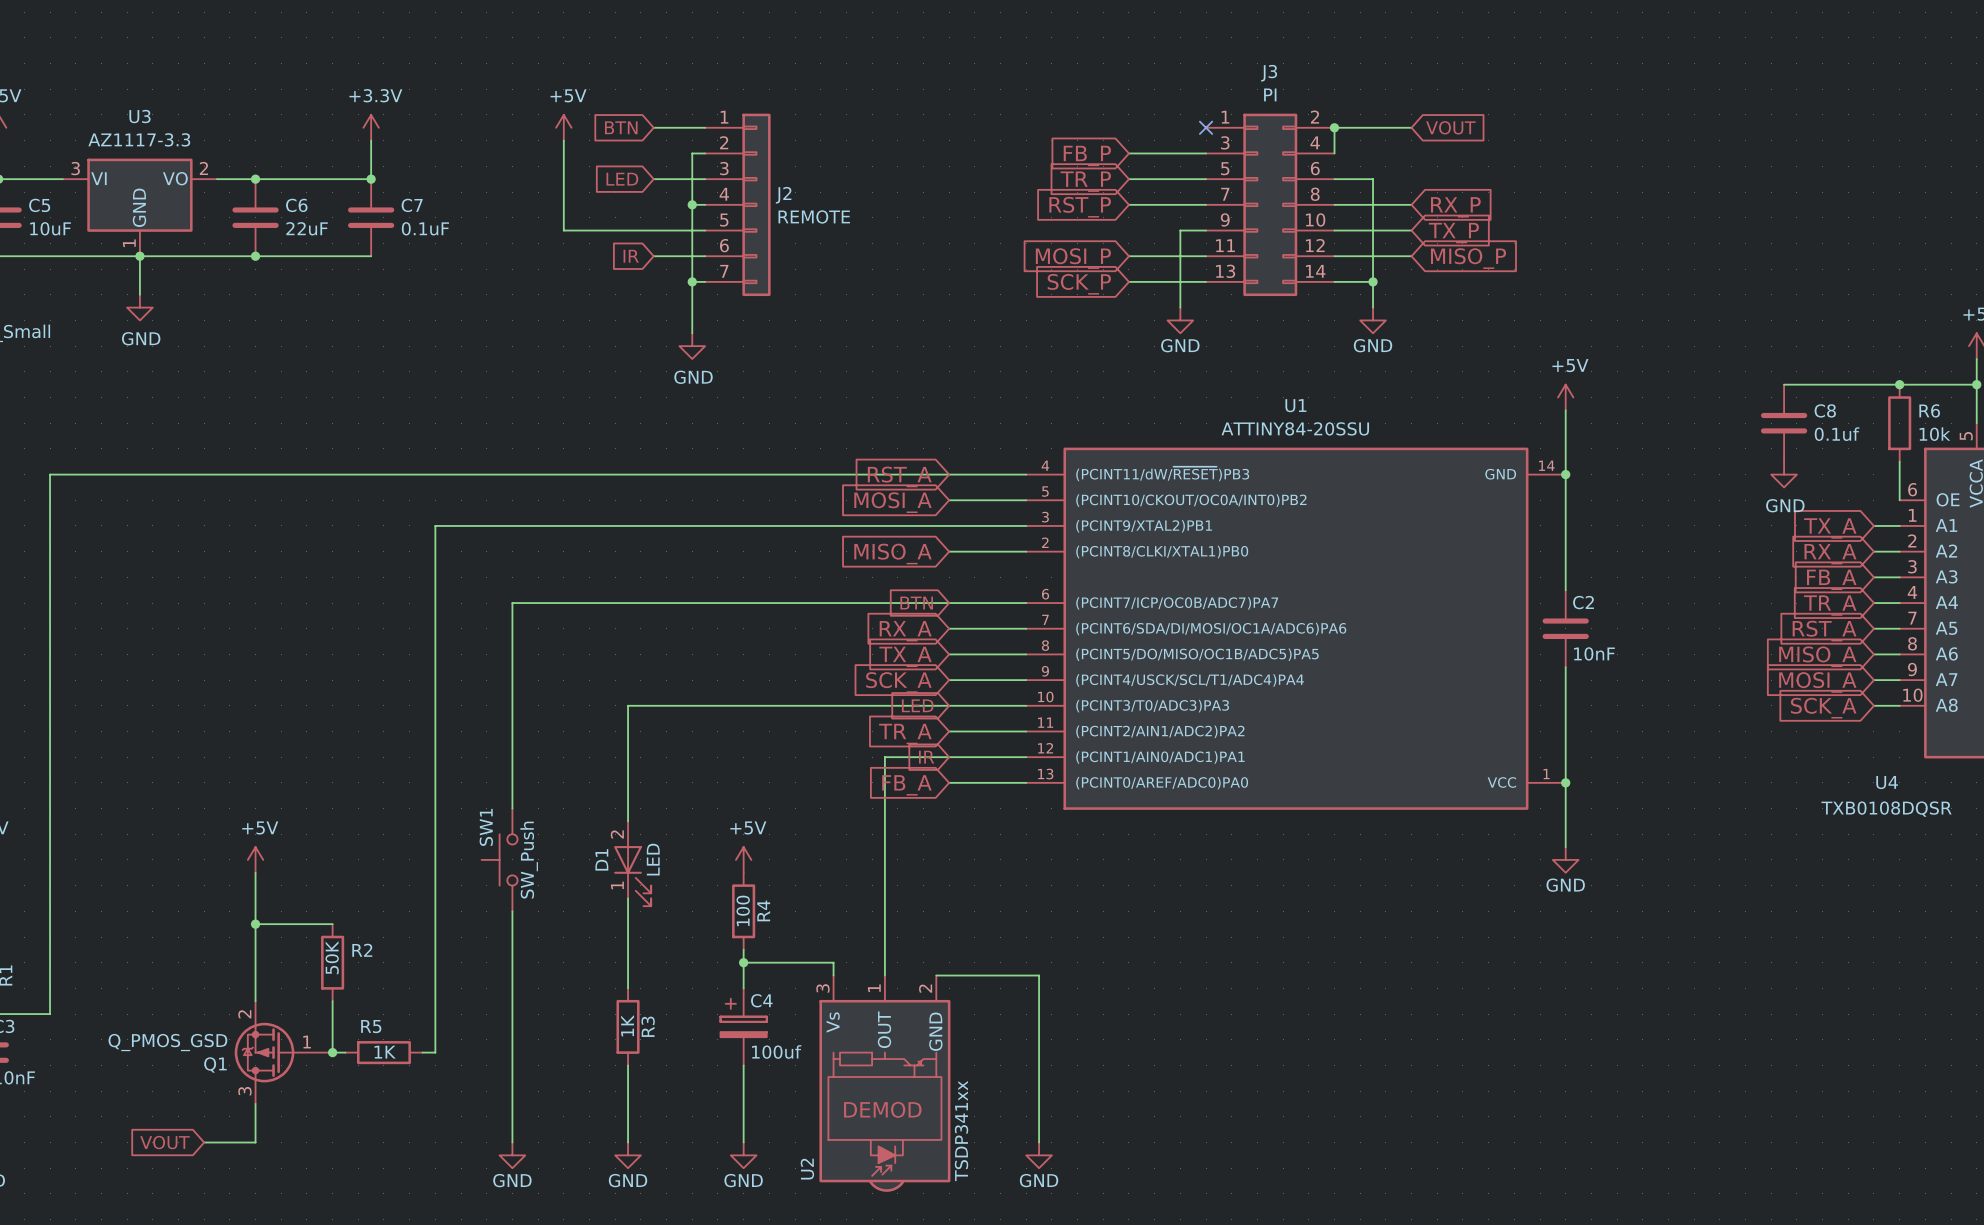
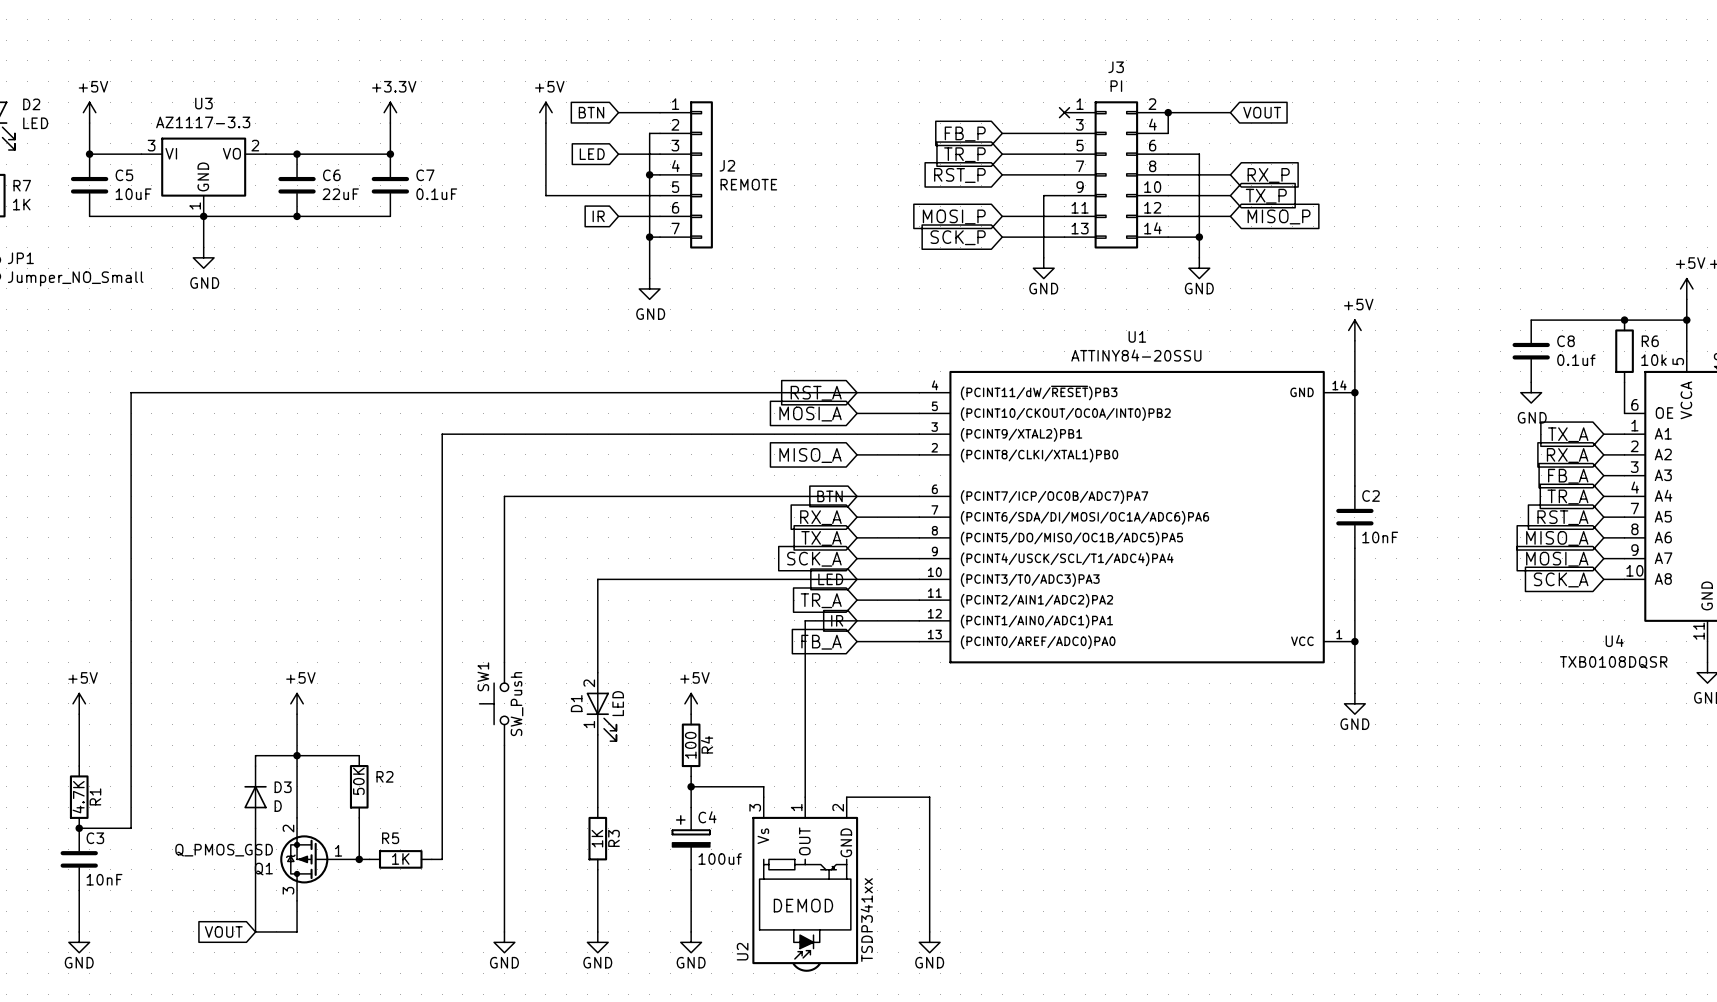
wire: none -> (297, 755) (255, 755) (255, 766)
D3: none -> D (255, 797)
wire: none -> (255, 828) (255, 931)

